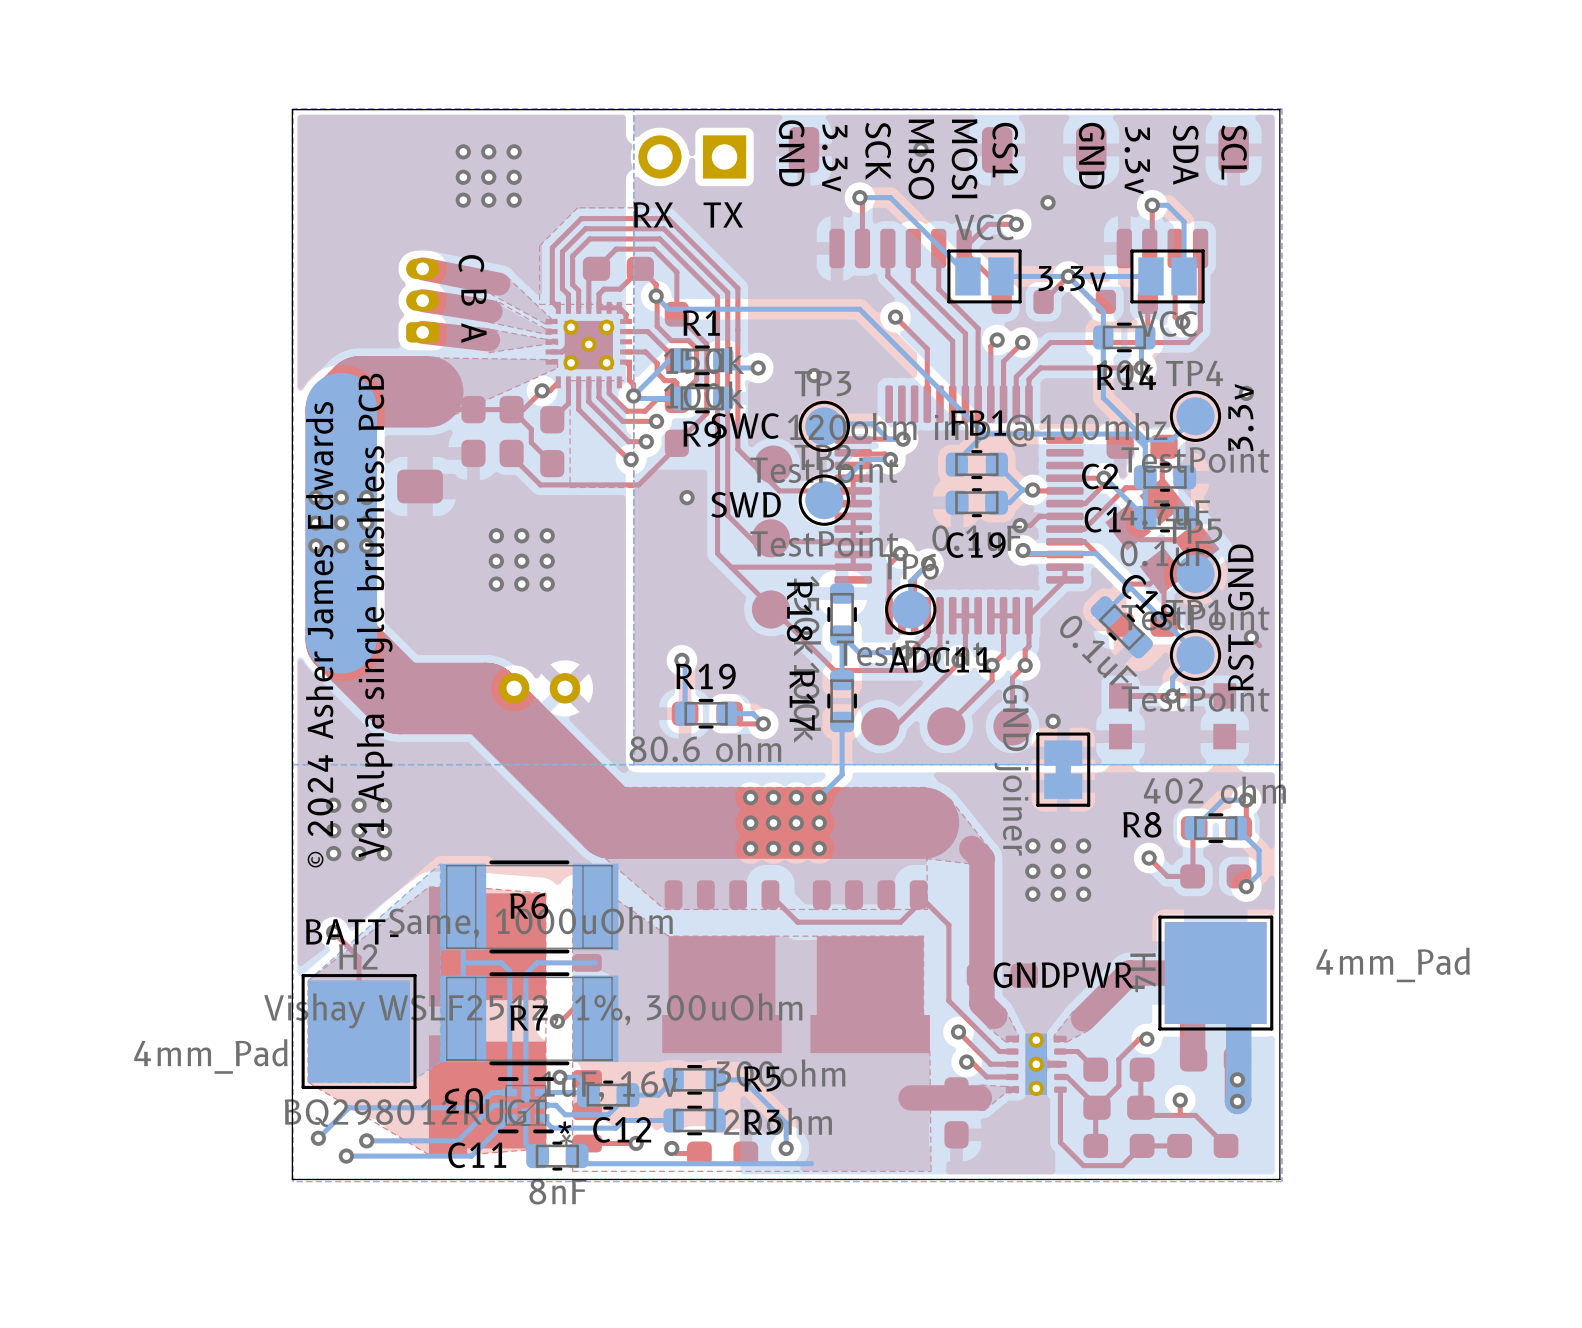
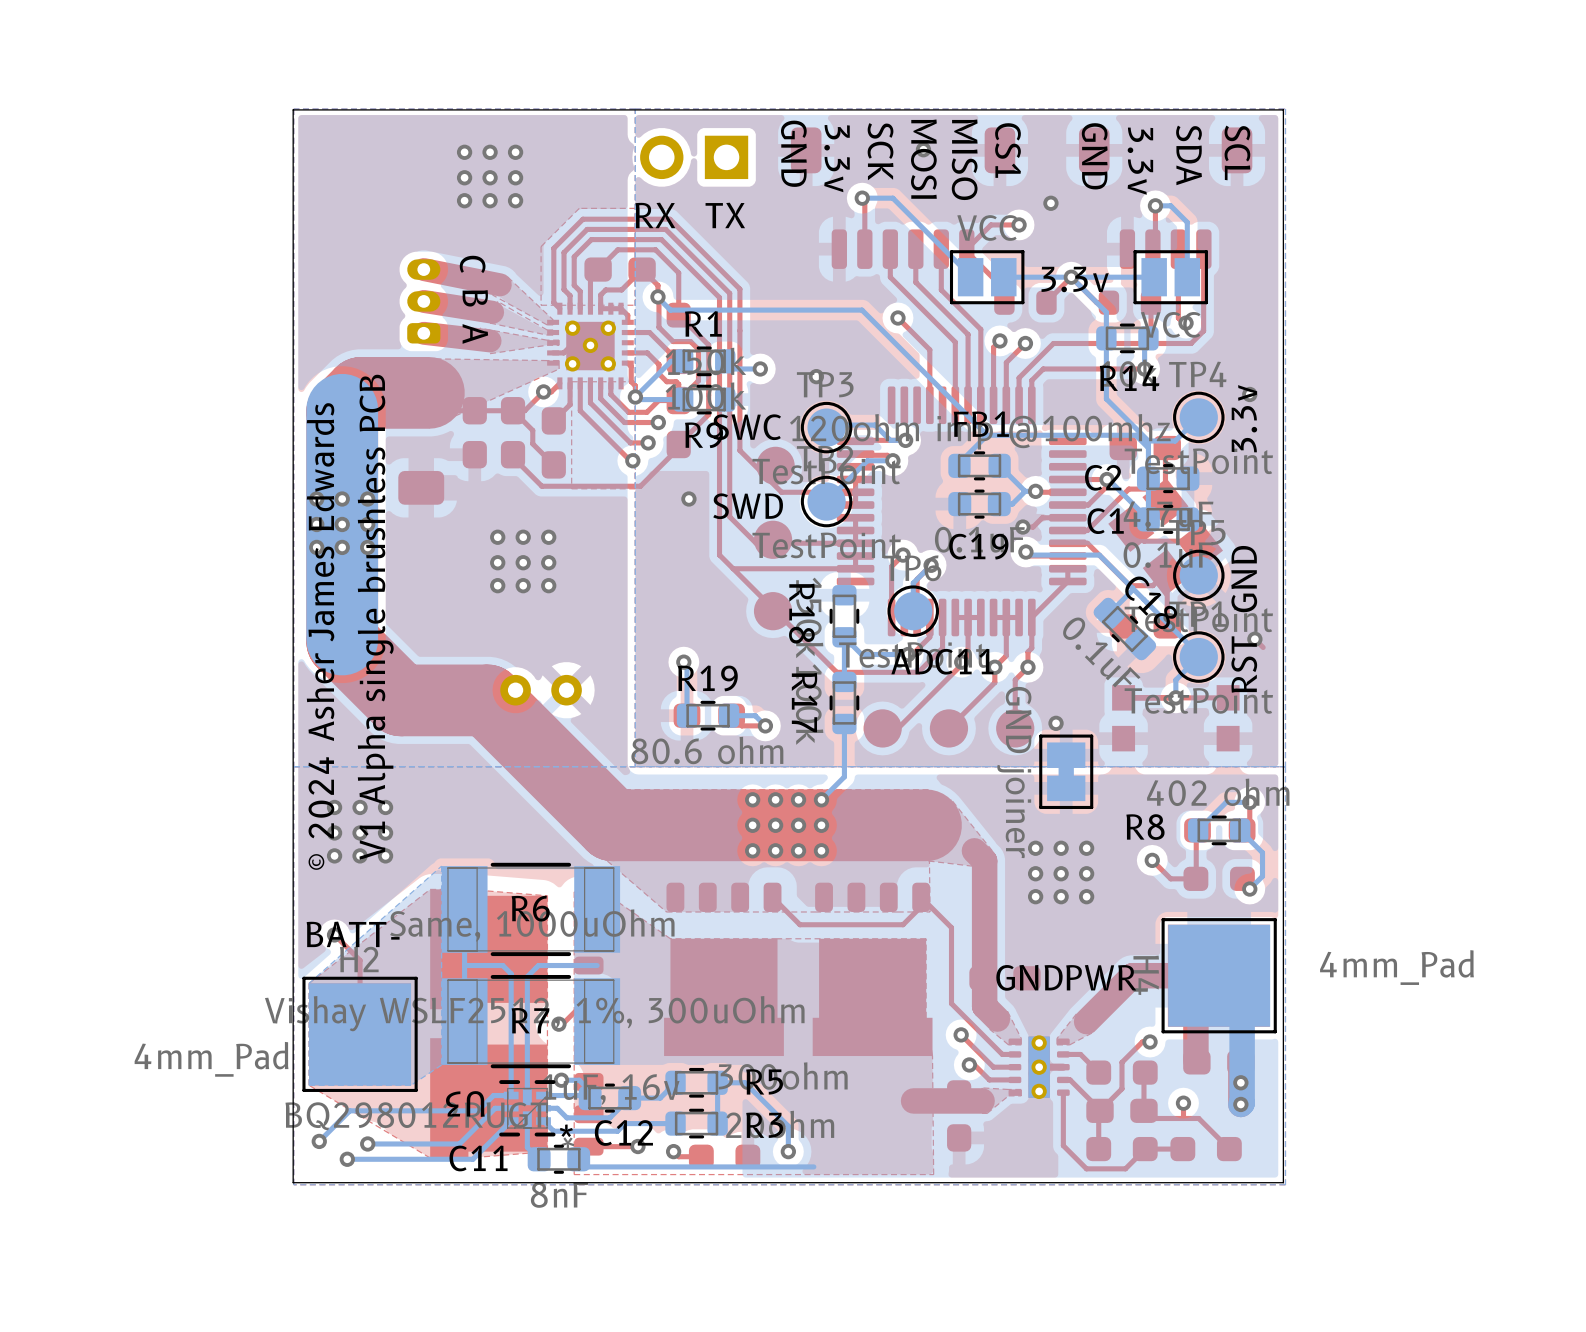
text: MOSI (964, 158) -> MISO (964, 159)
text: MISO (921, 159) -> MOSI (923, 159)

